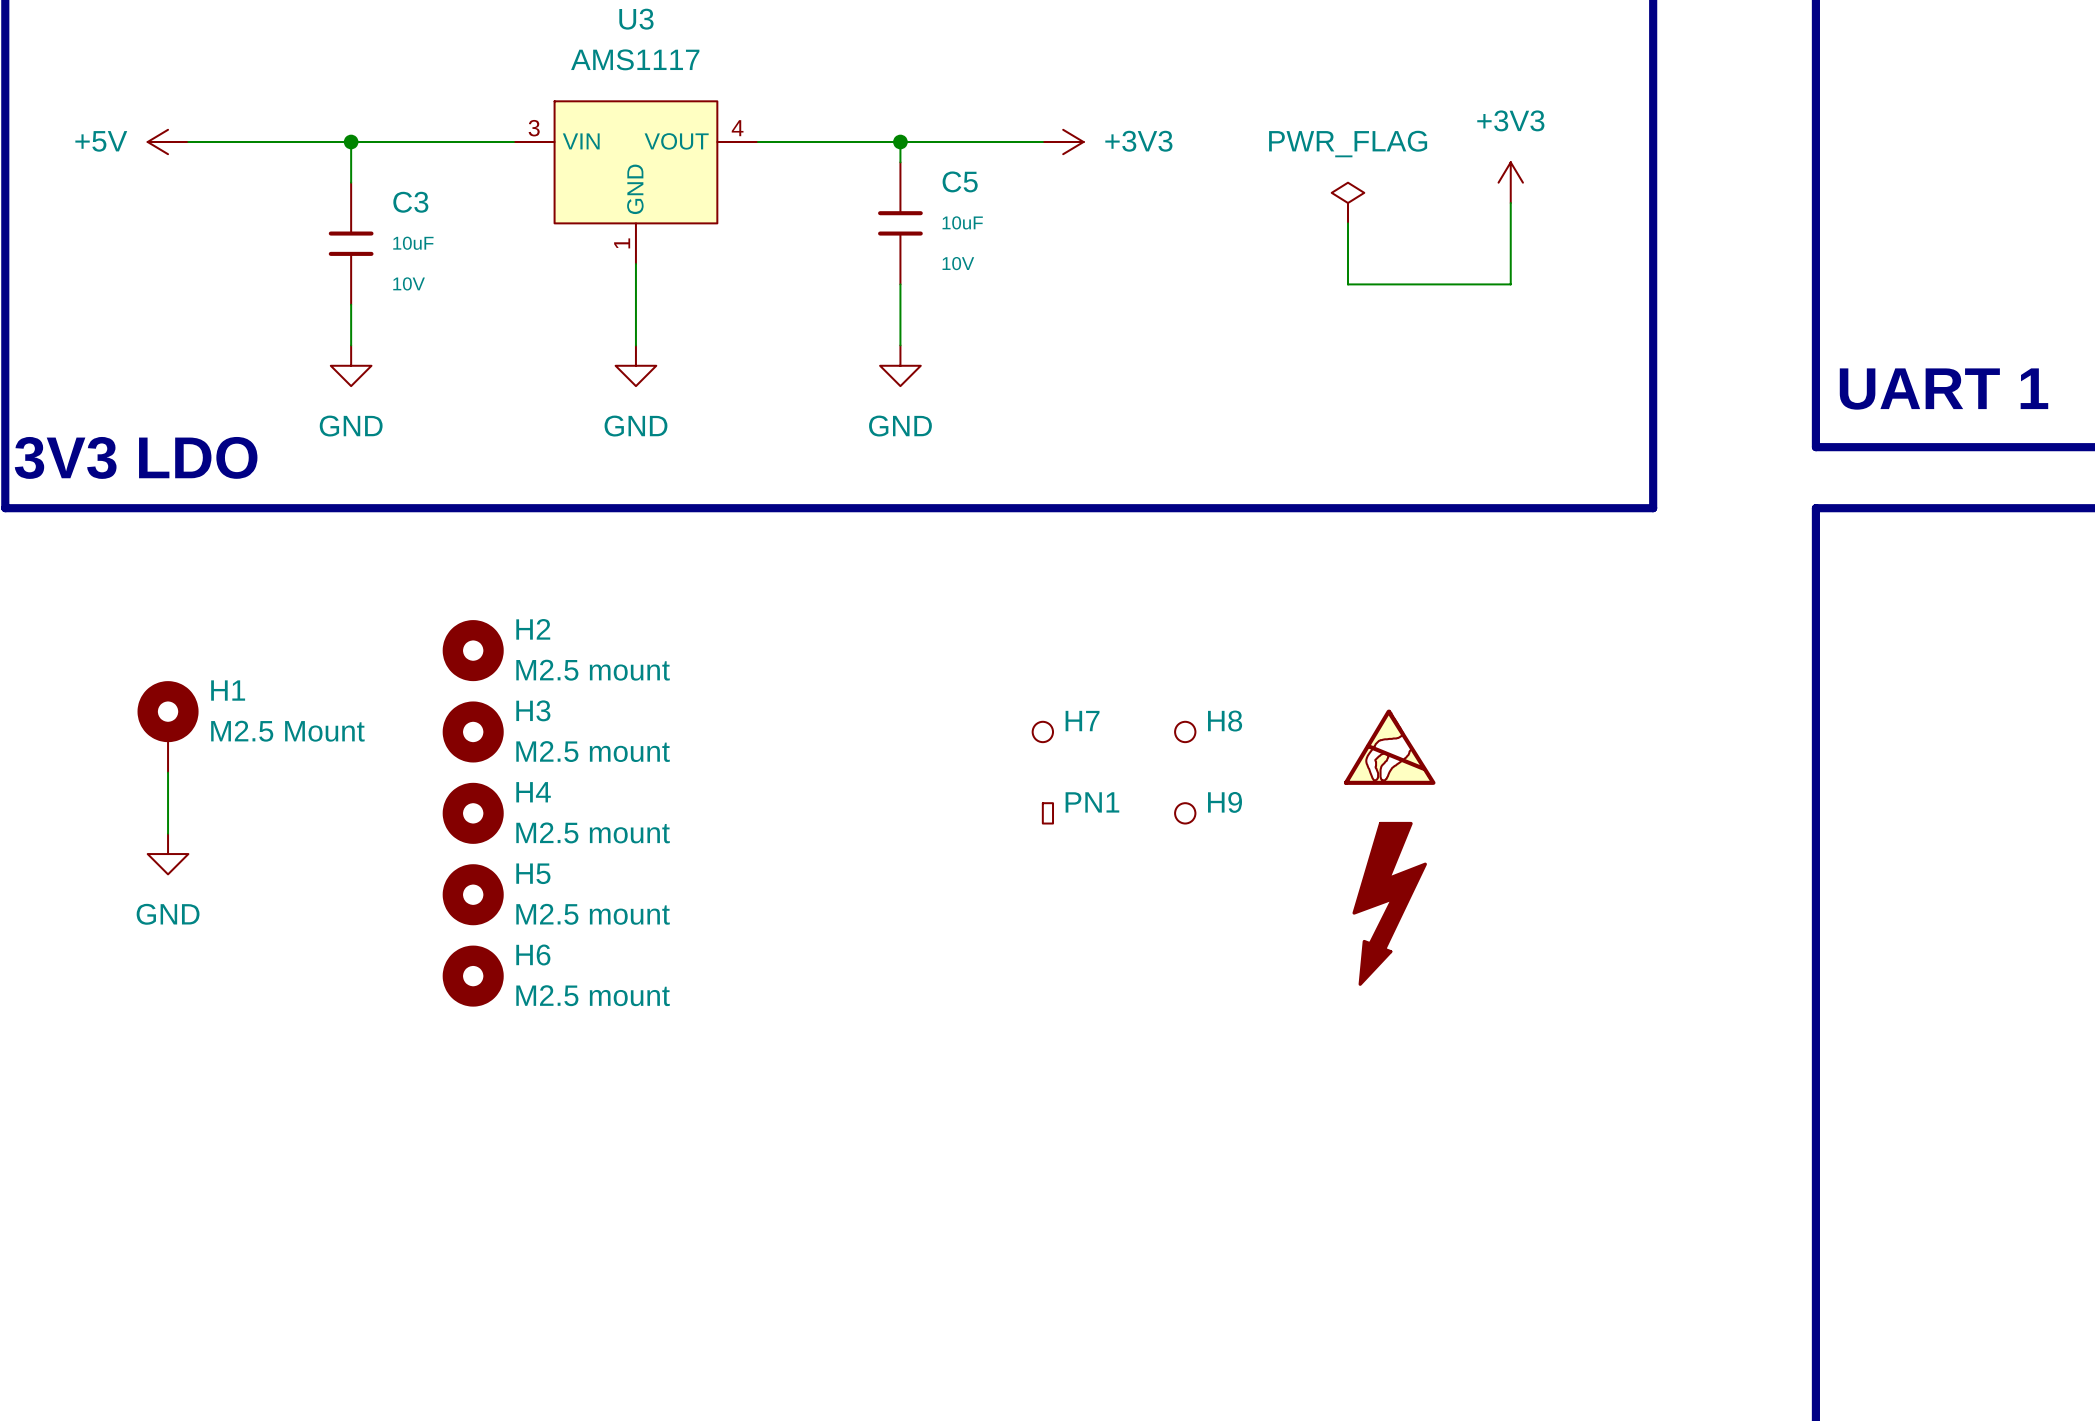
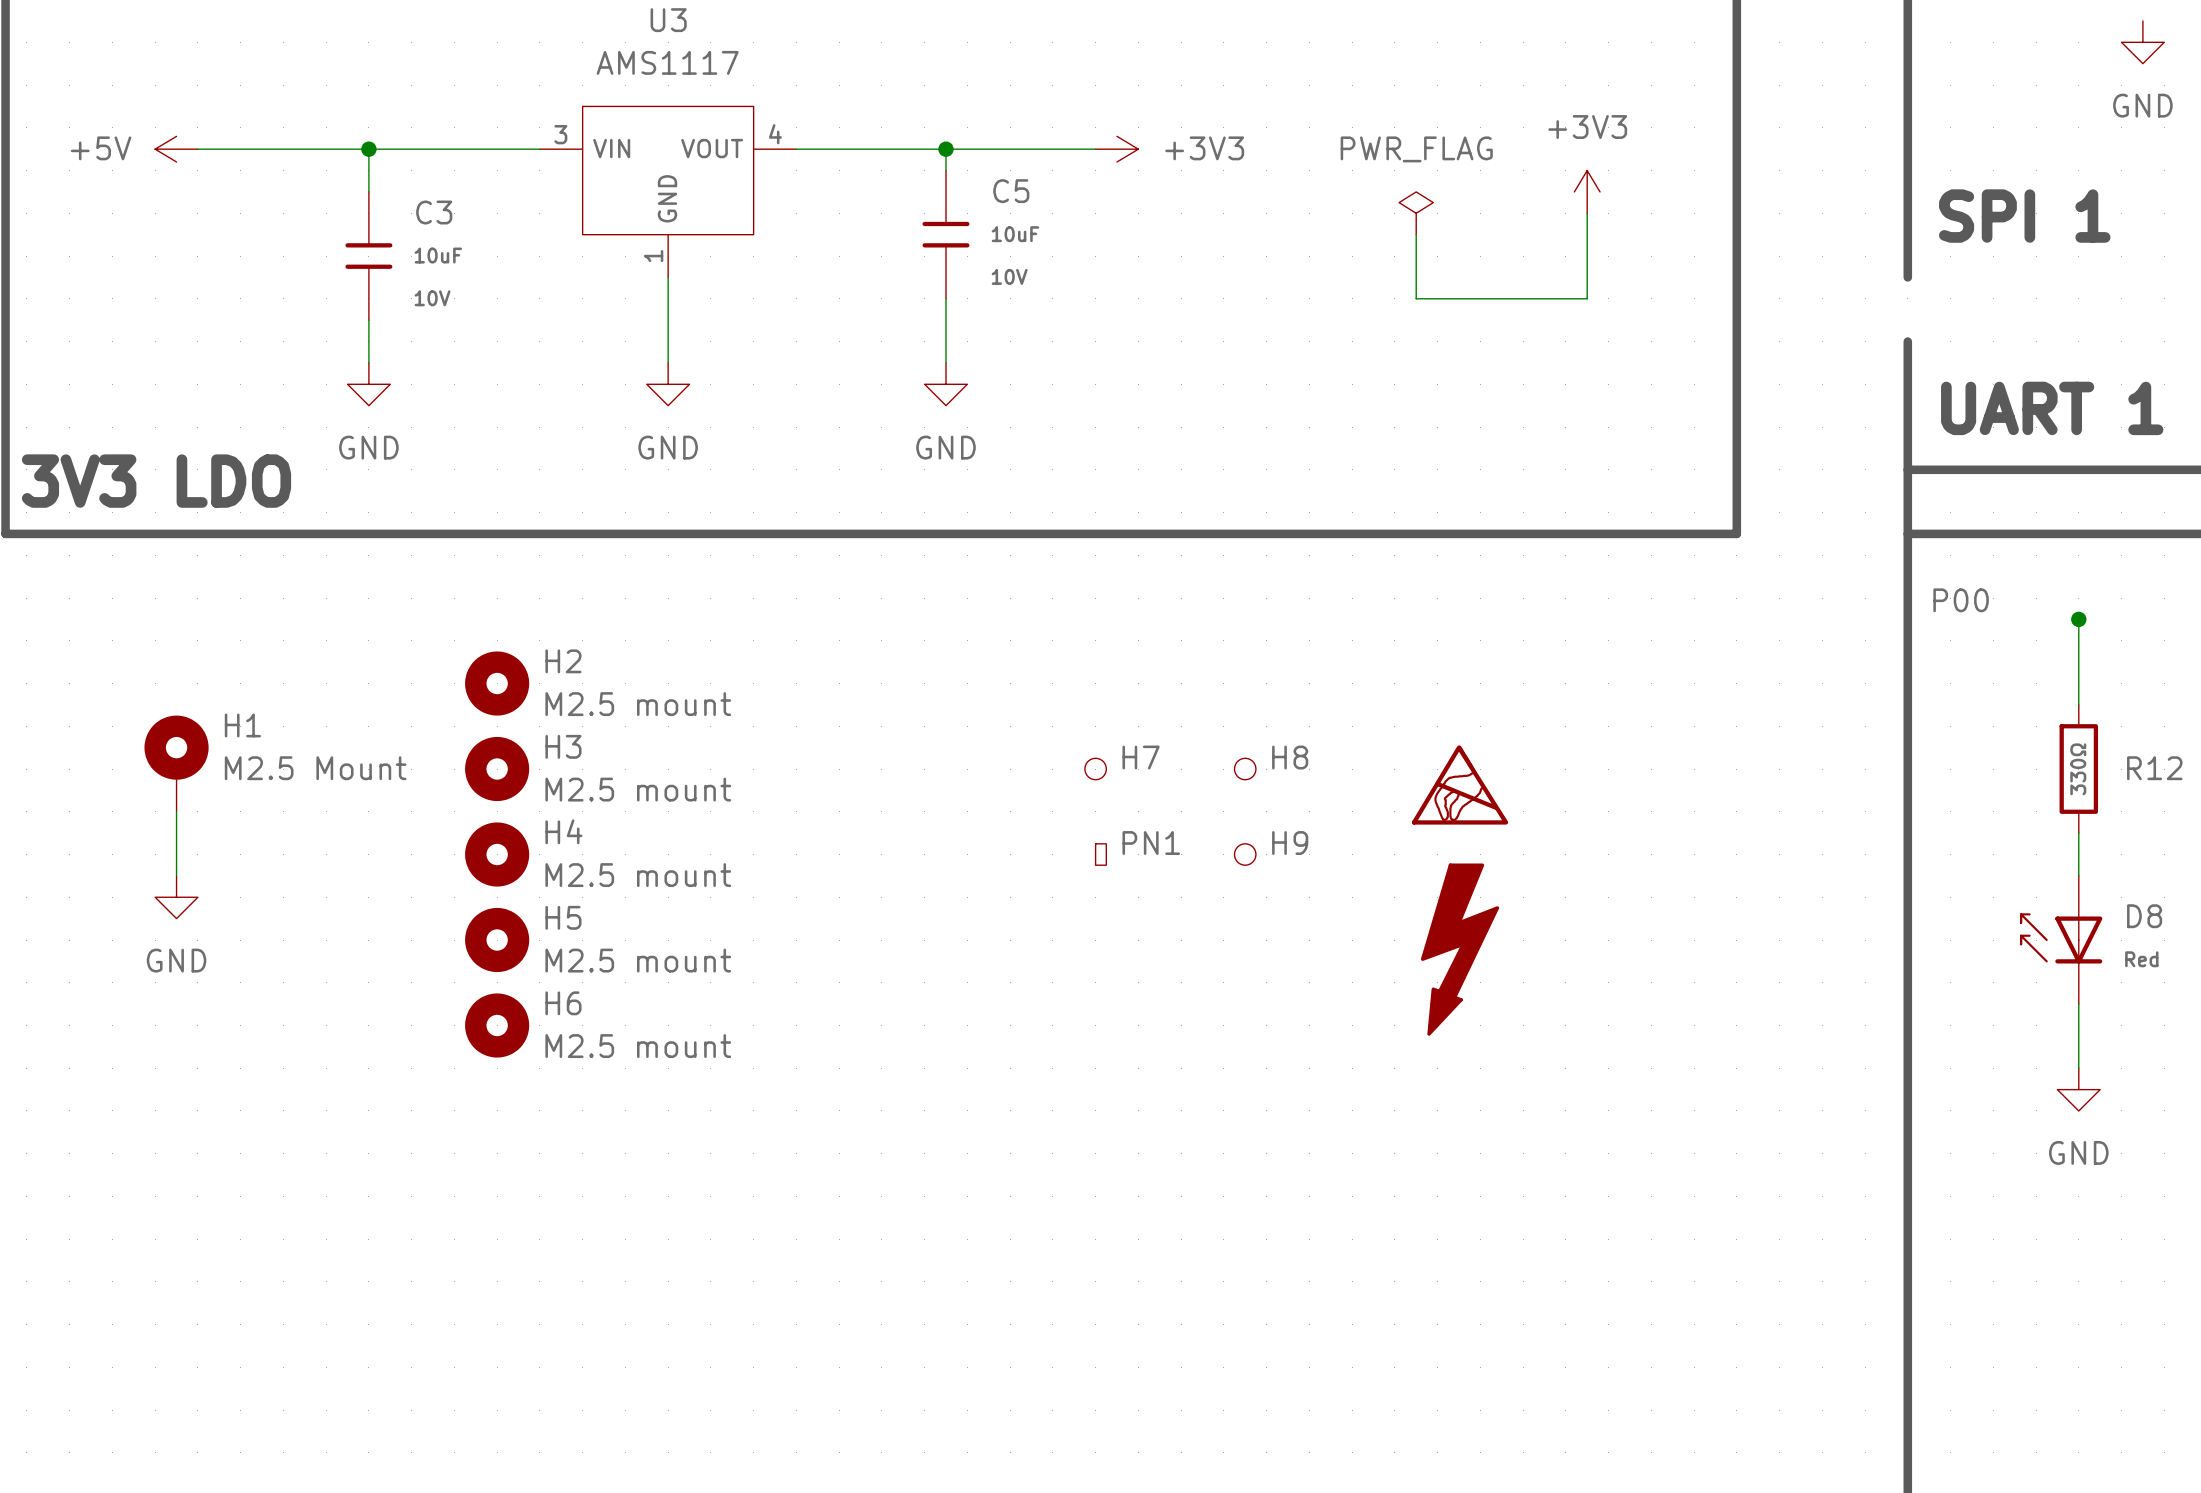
power symbol: none -> GND (2142, 42)
text: none -> SPI 1 (2024, 216)
line: (1815, 264) (1815, 325) -> (1907, 469) (1907, 533)
label: none -> P00 (1961, 600)
wire: none -> (2078, 619) (2078, 704)
junction: none -> (2078, 619)
R12: none -> 330Ω (2078, 769)
wire: none -> (2078, 833) (2078, 875)
D8: none -> Red (2061, 940)
wire: none -> (2078, 1004) (2078, 1068)
power symbol: none -> GND (2078, 1089)

